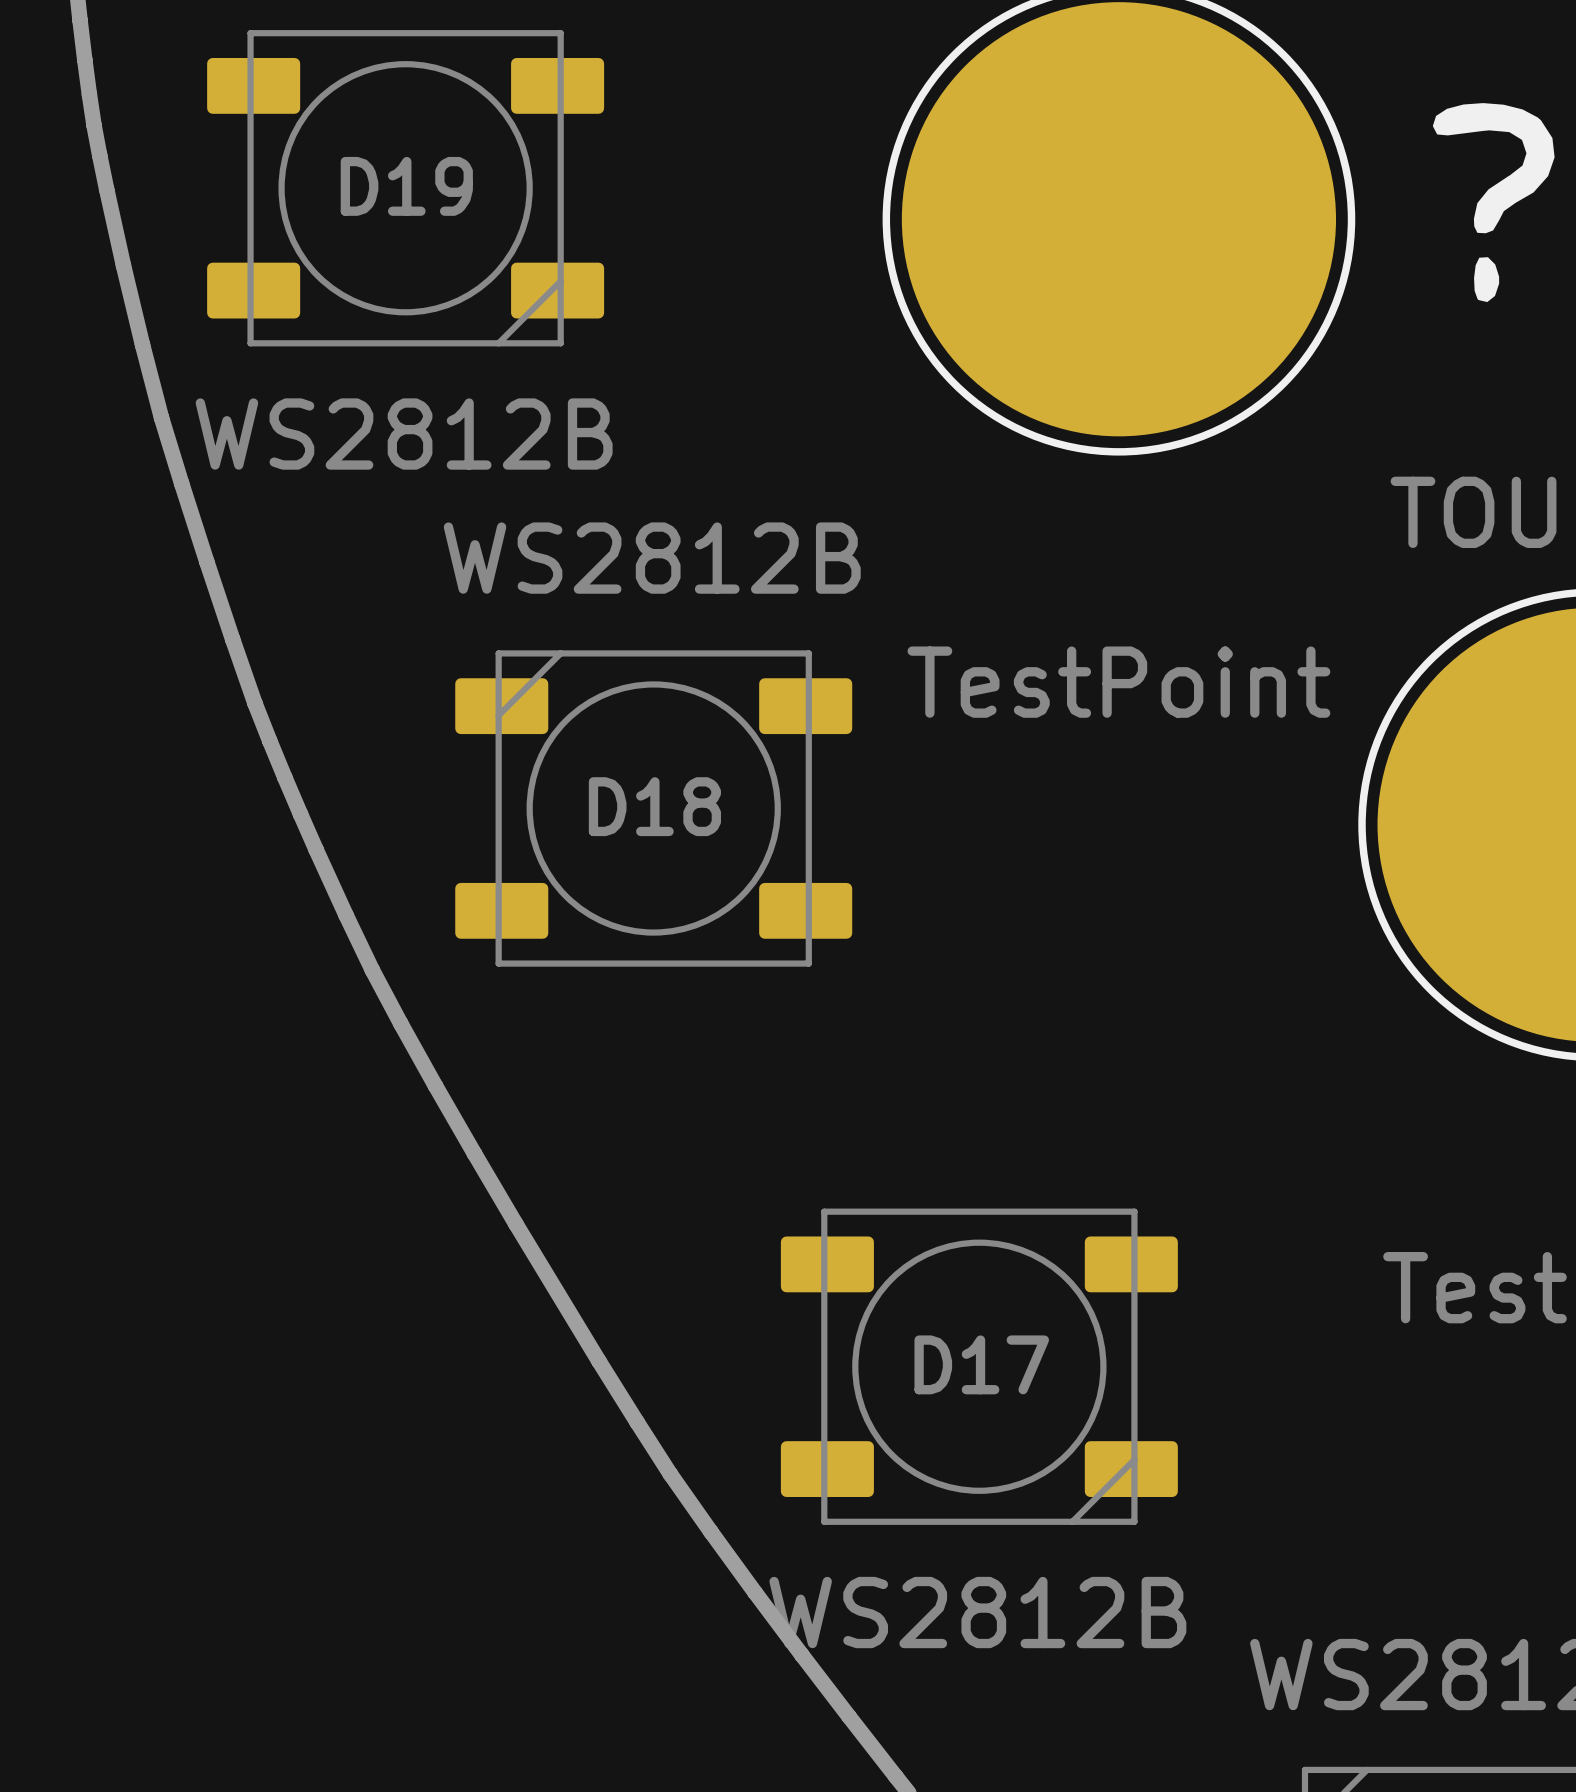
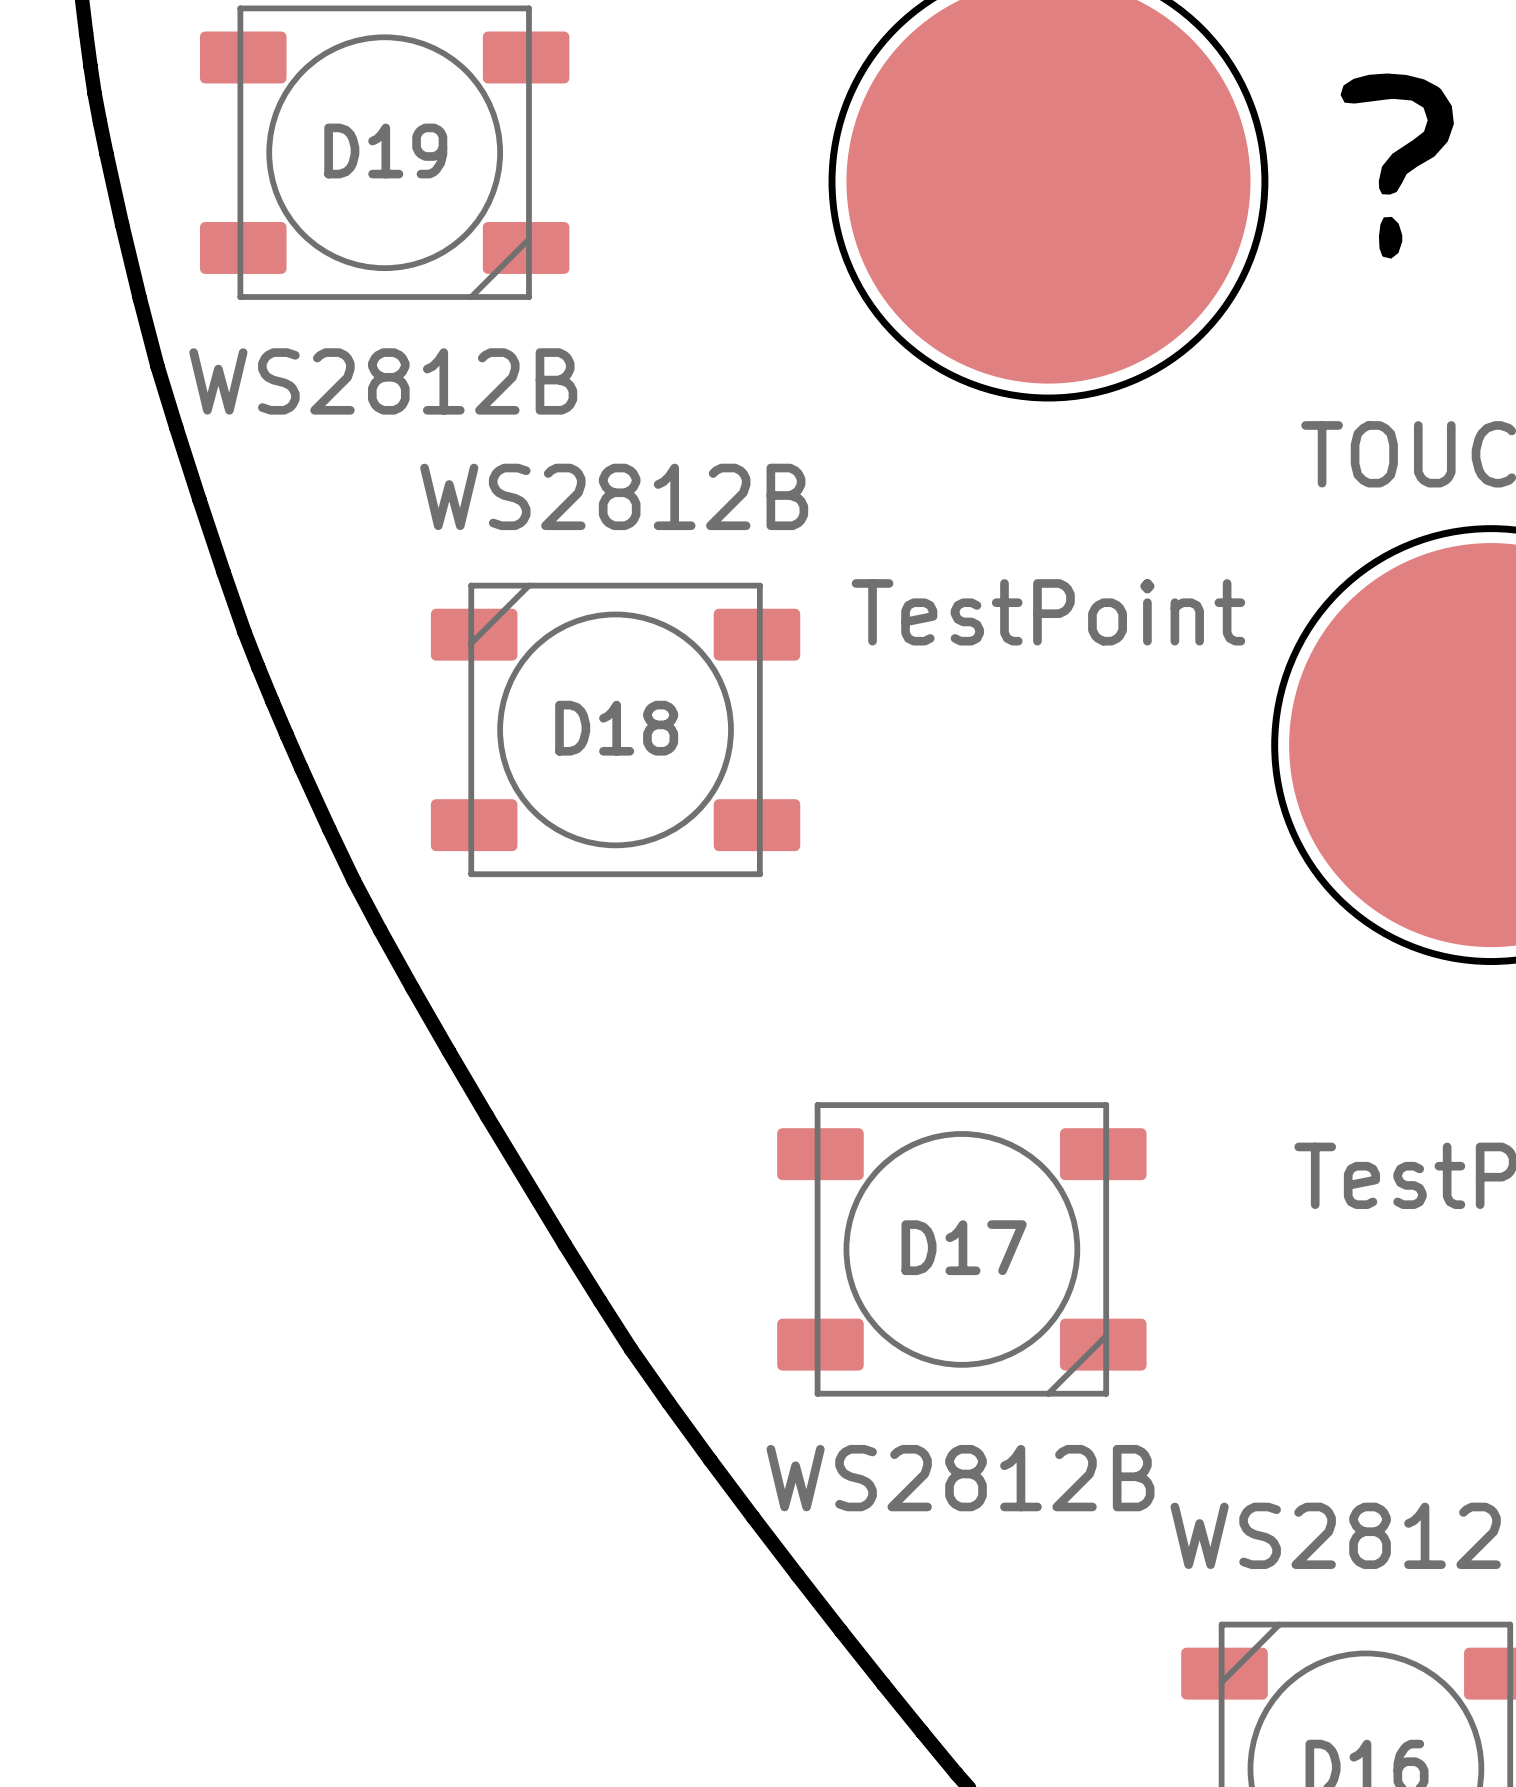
D17 position: (979, 1366) -> (961, 1249)

